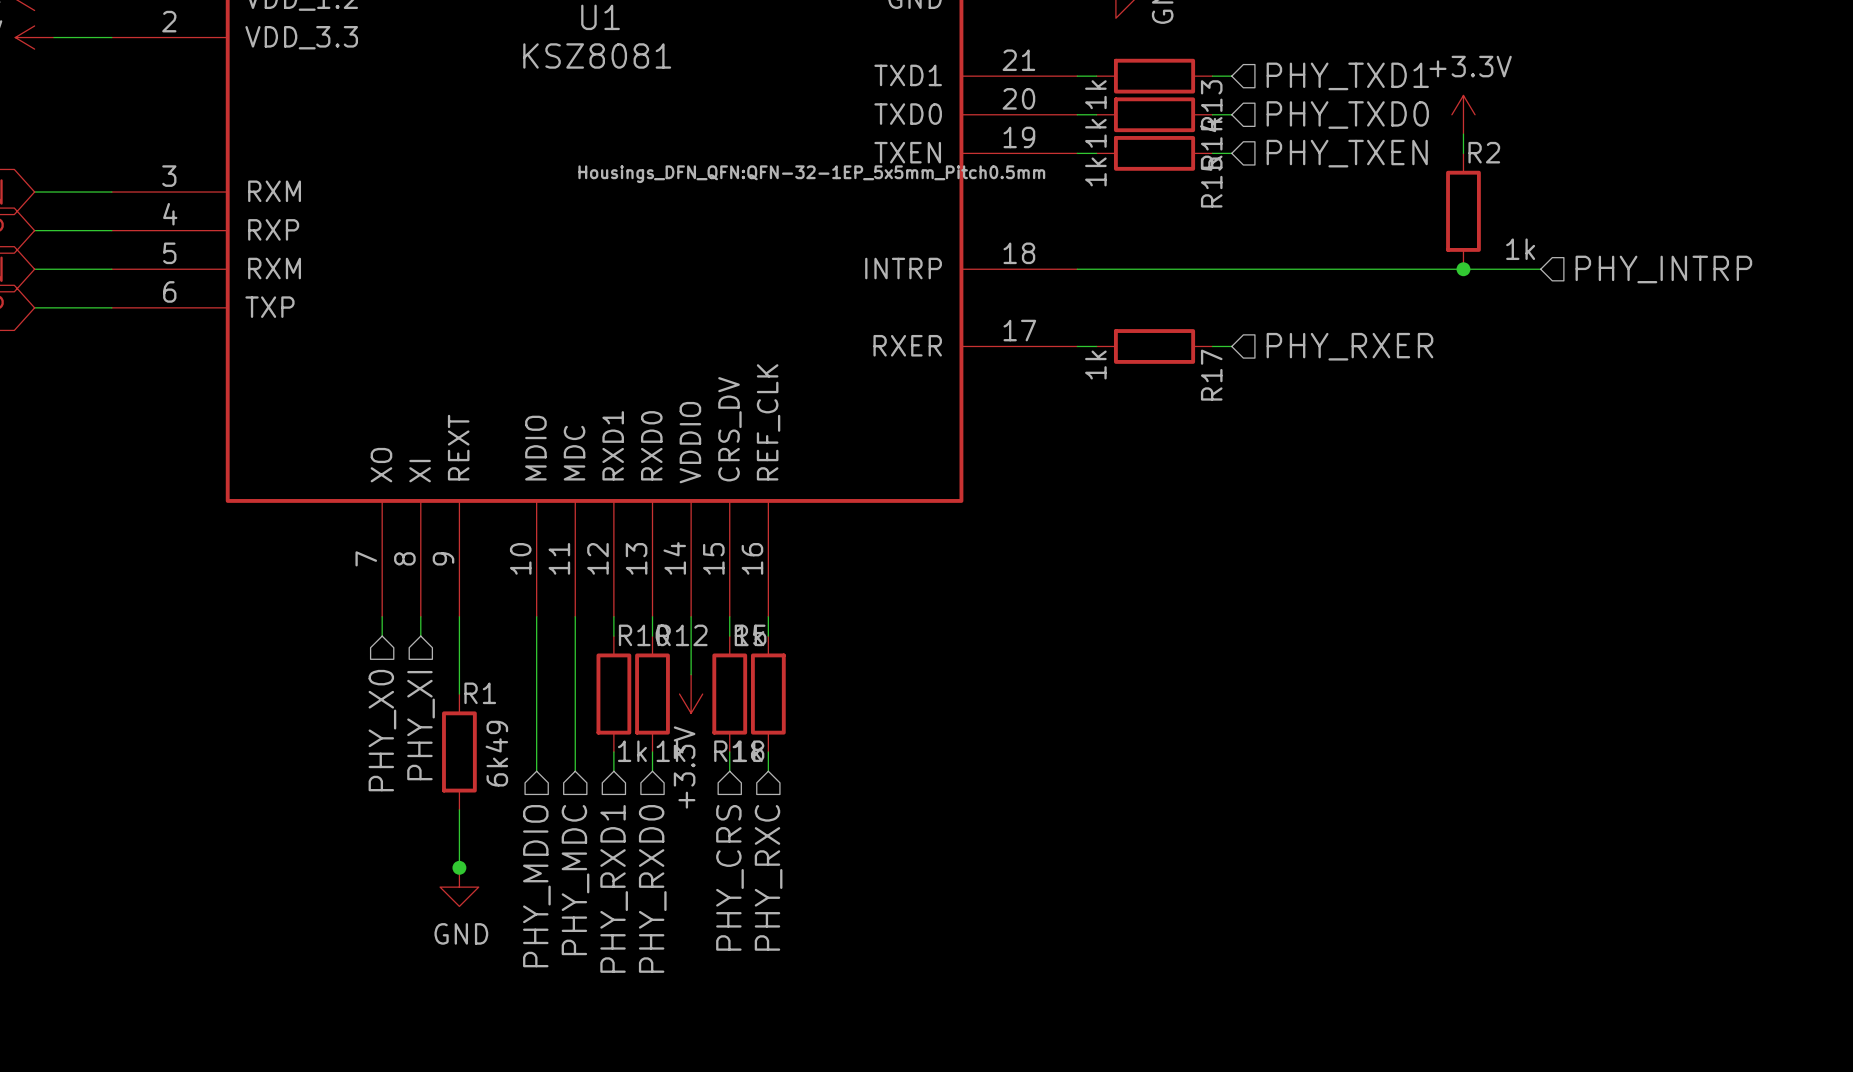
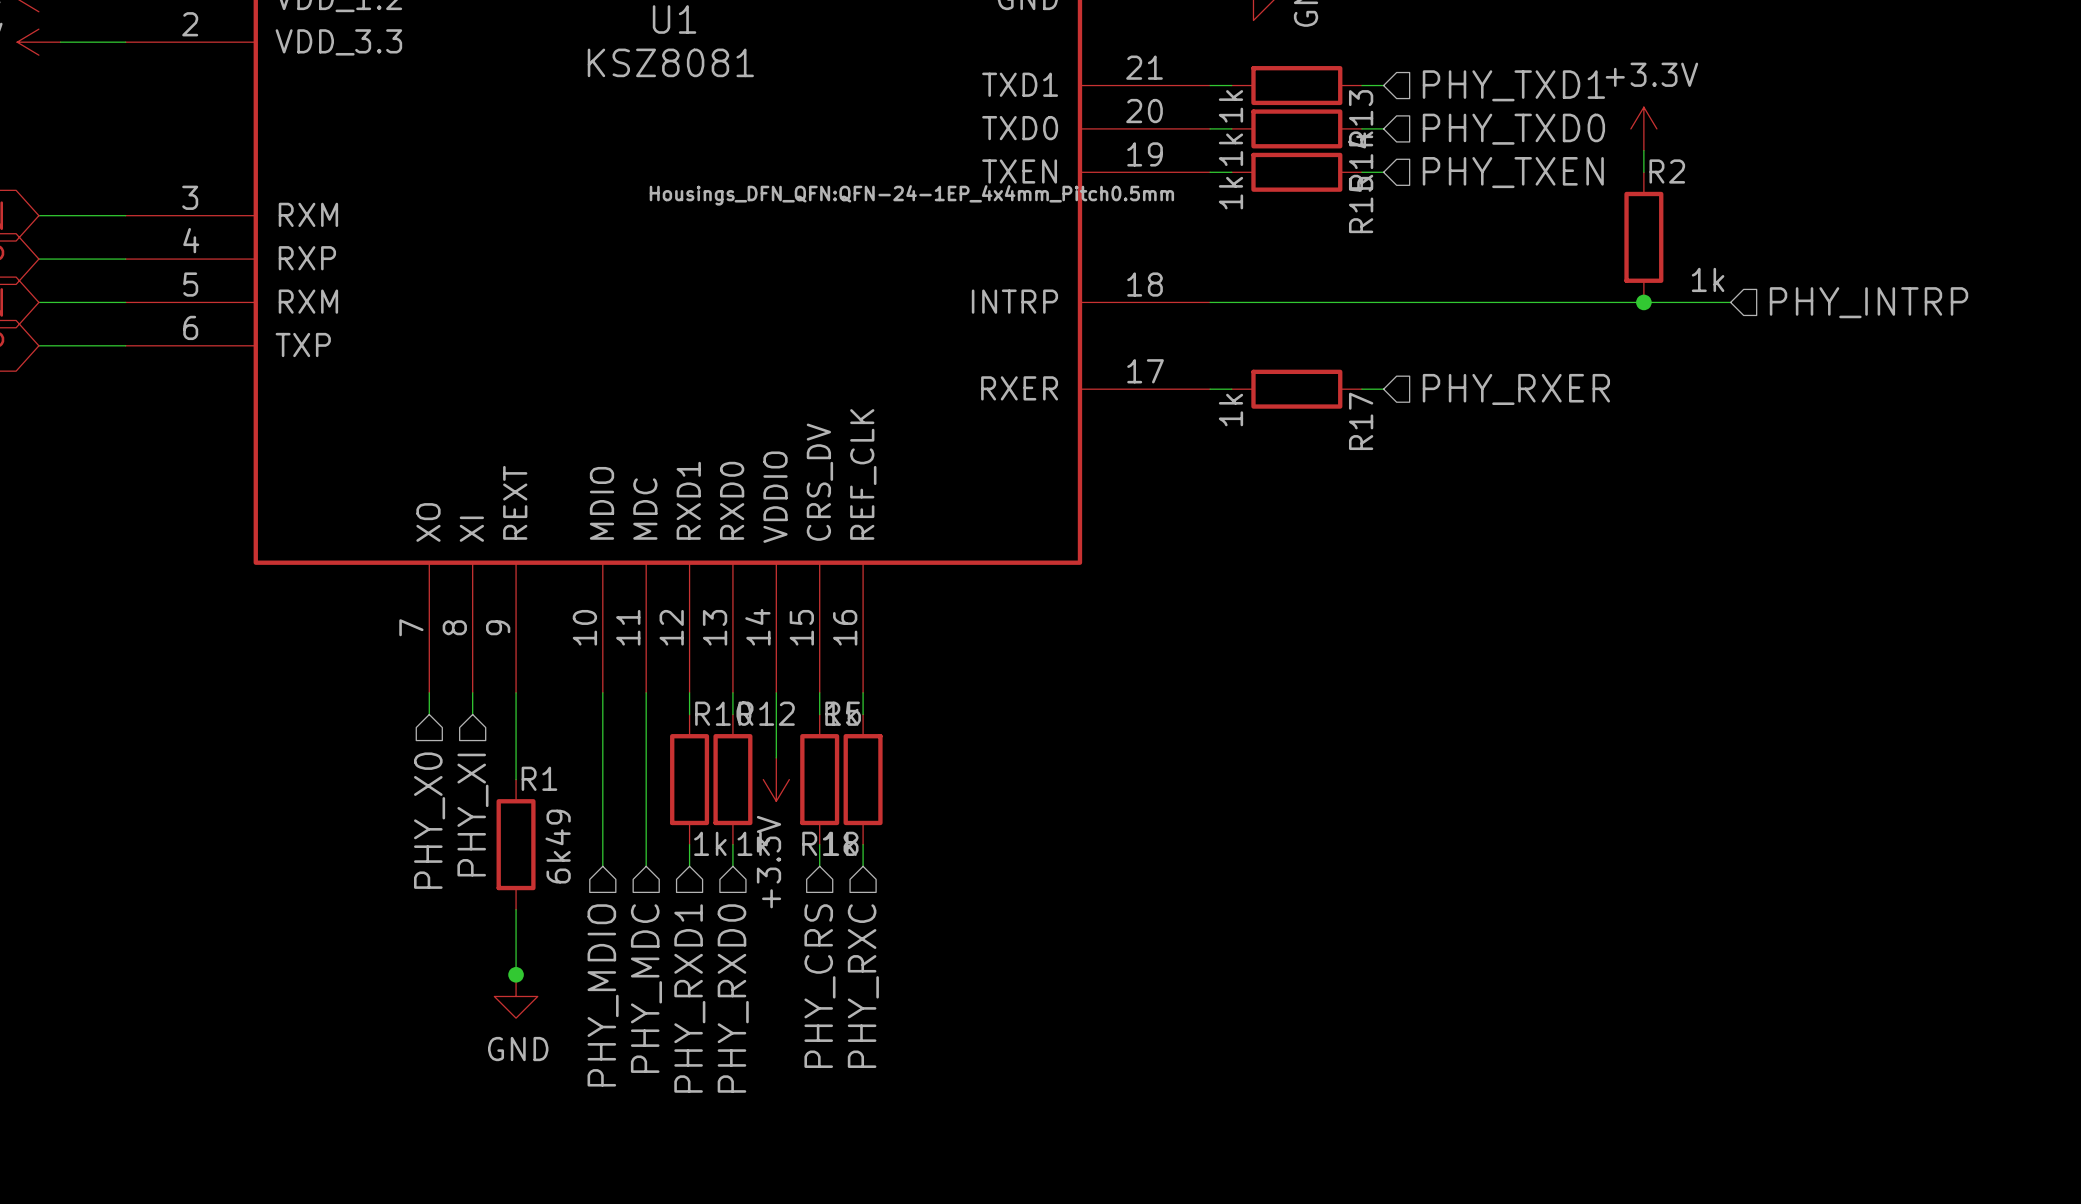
U1 text: Housings_DFN_QFN:QFN-32-1EP_5x5mm_Pitch0.5mm (811, 174) -> Housings_DFN_QFN:QFN-24-1EP_4x4mm_Pitch0.5mm (911, 195)

